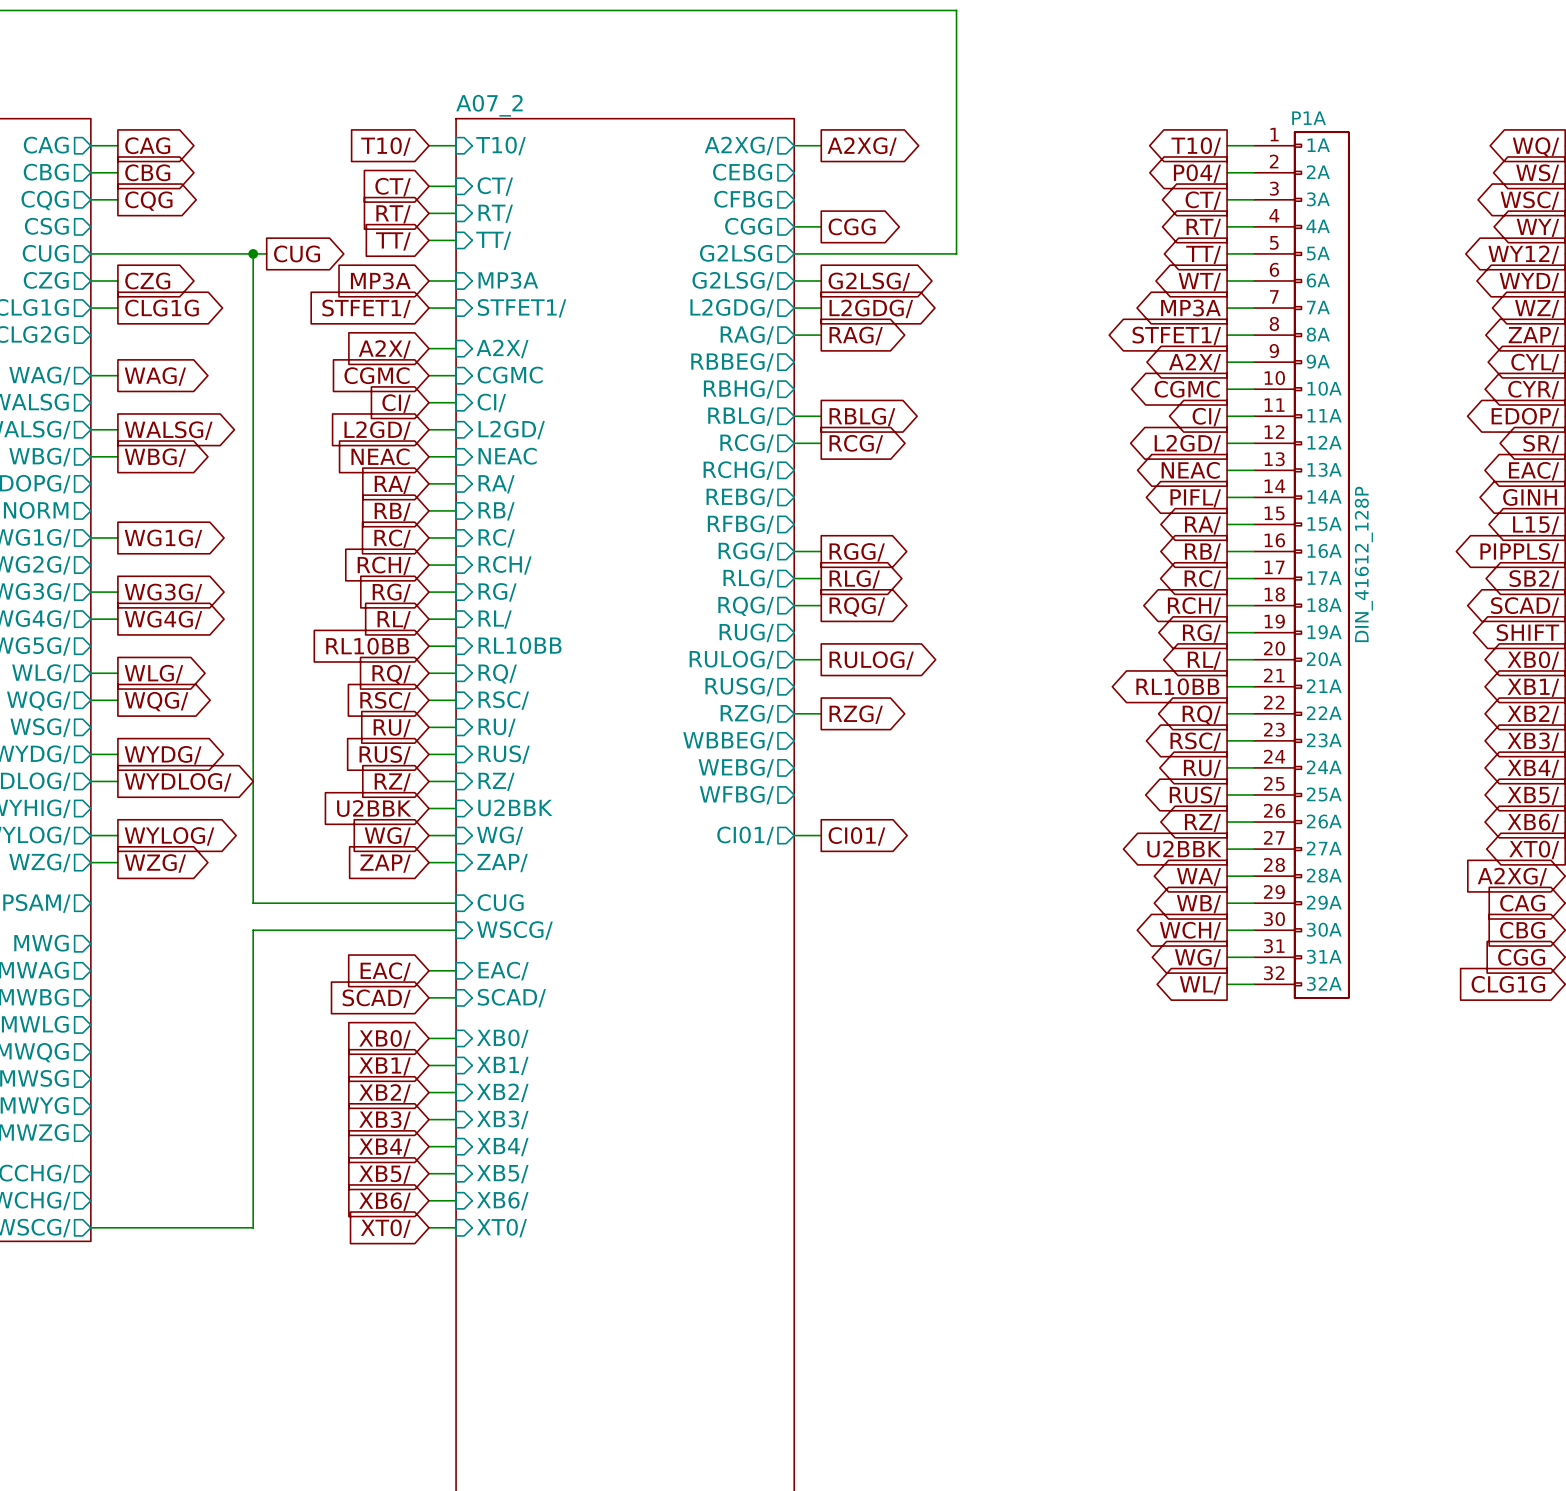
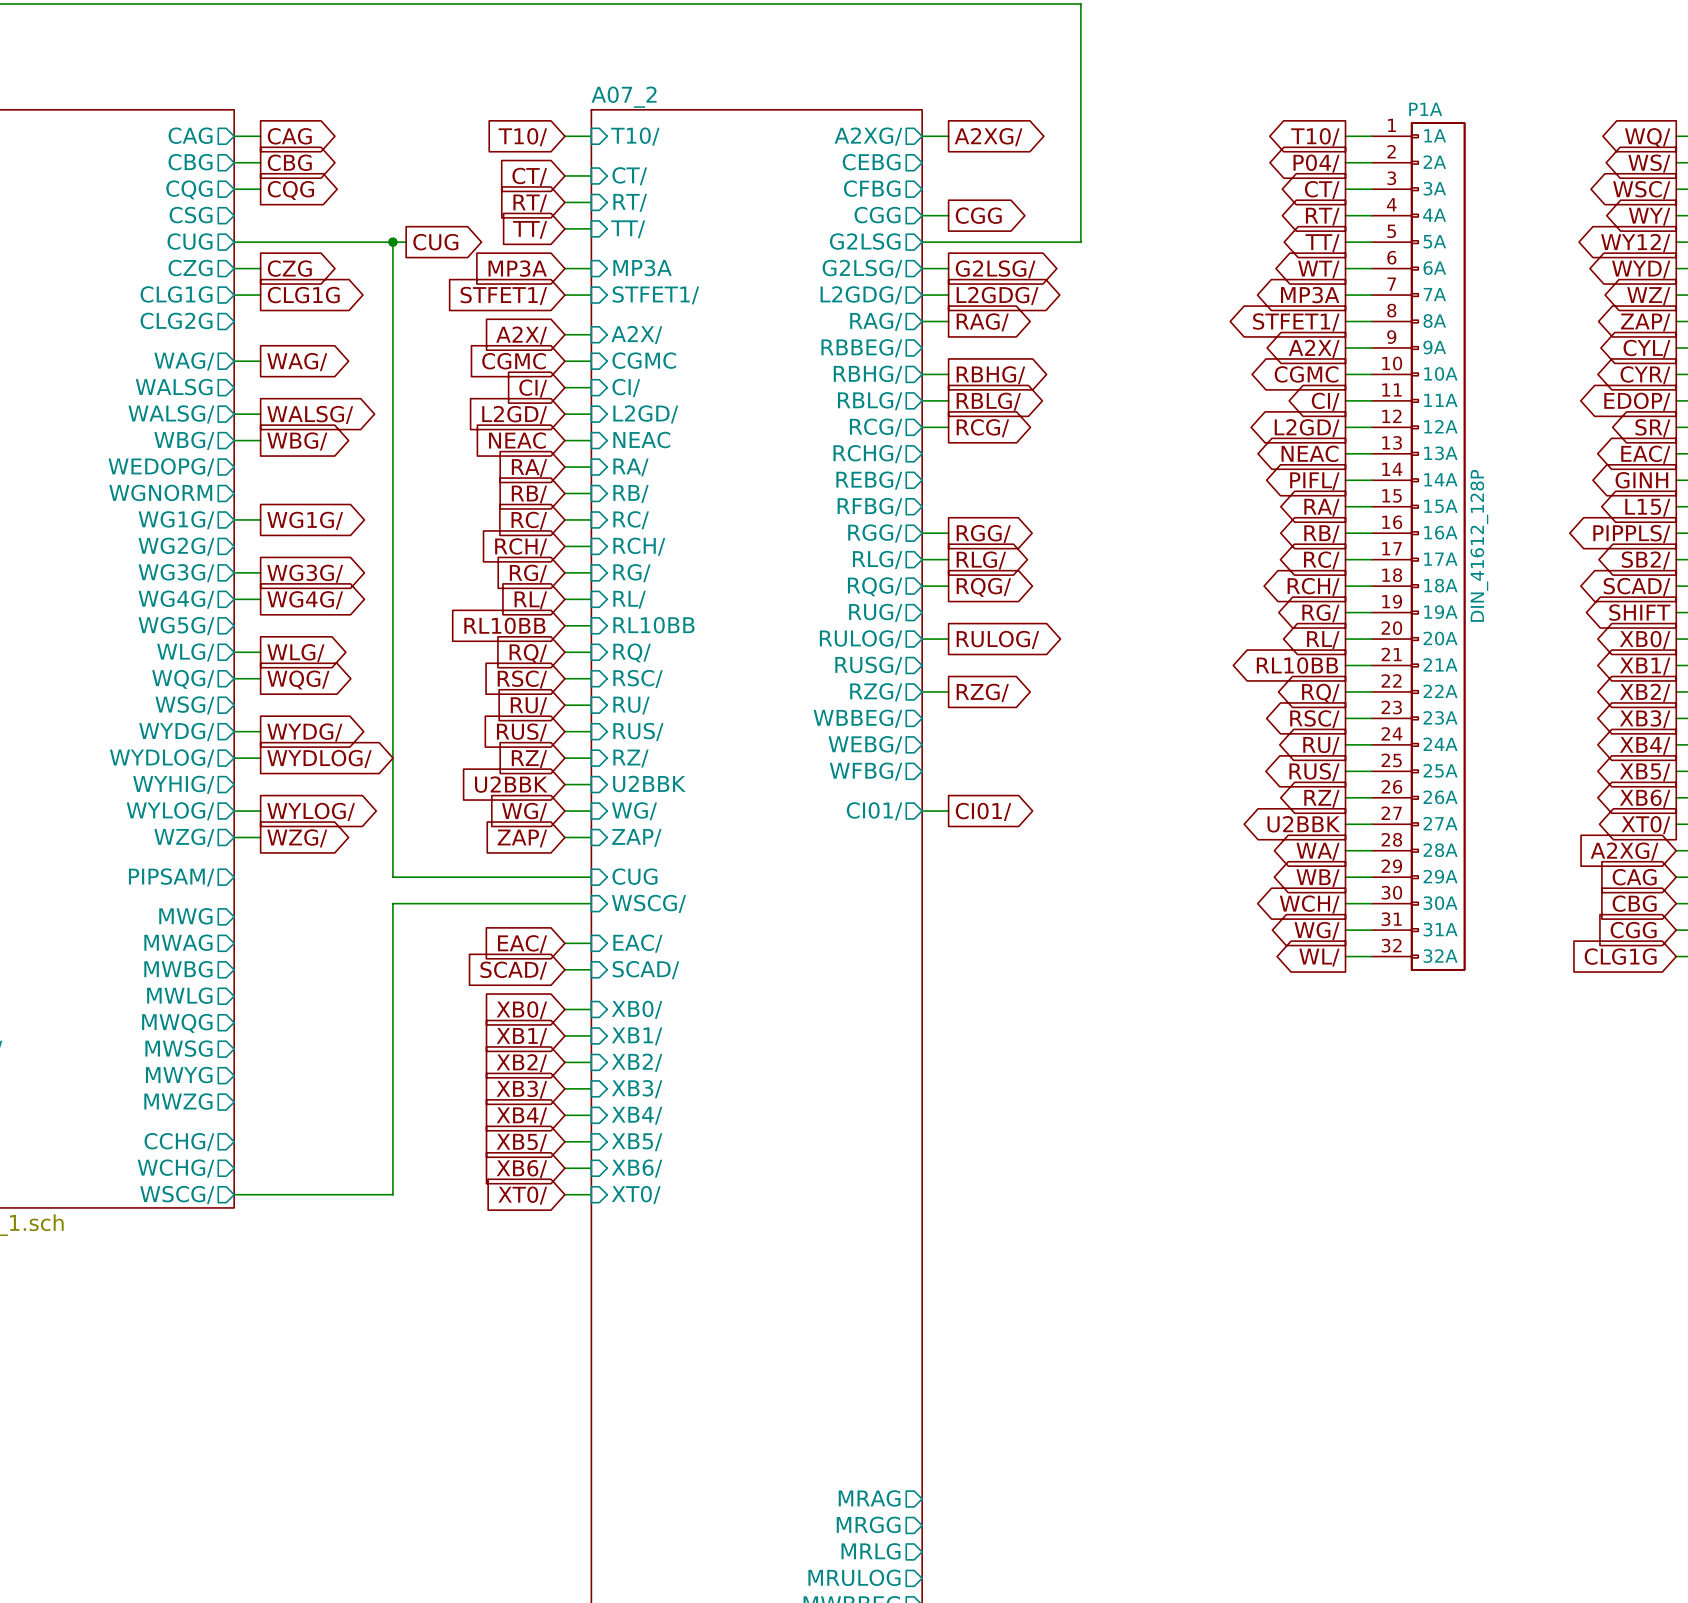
wire: none -> (922, 374) (948, 374)
global label: none -> RBHG/ (990, 375)

